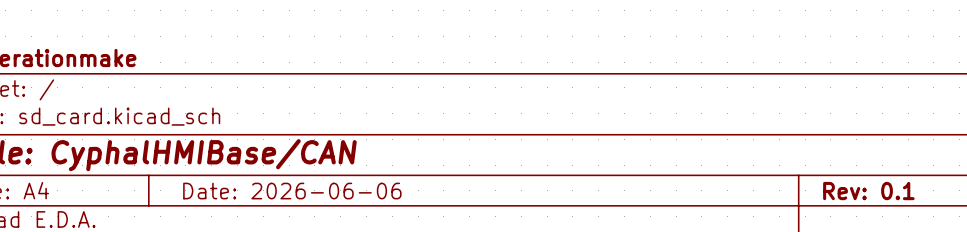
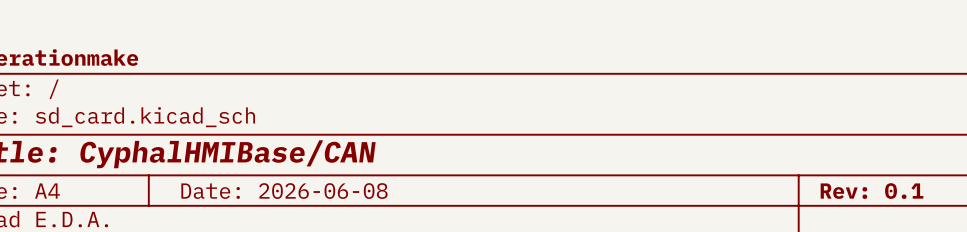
title block: Date: 2026-06-06 (292, 191) -> Date: 2026-06-08 (284, 191)

